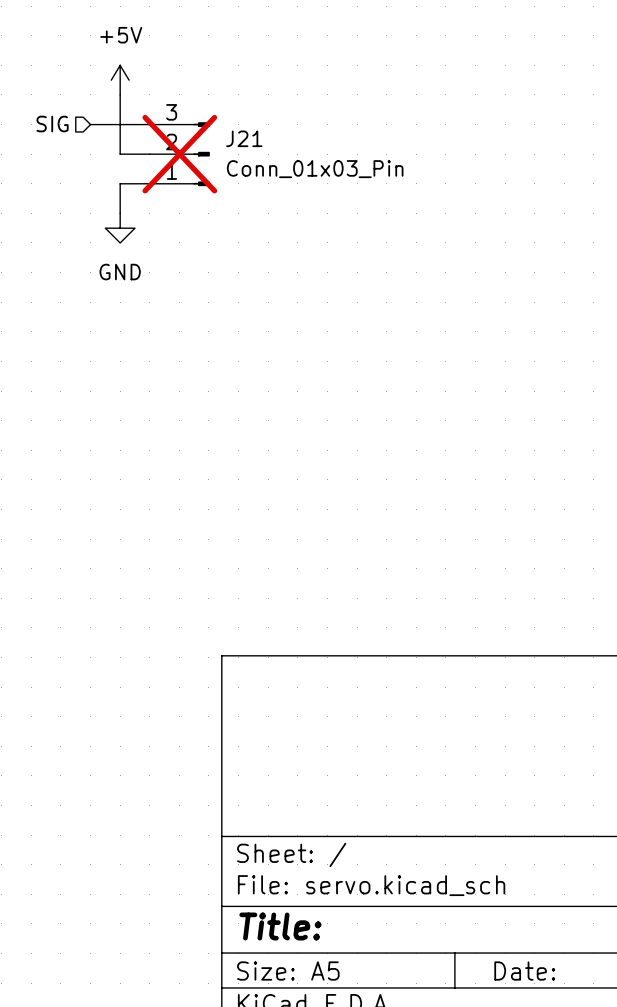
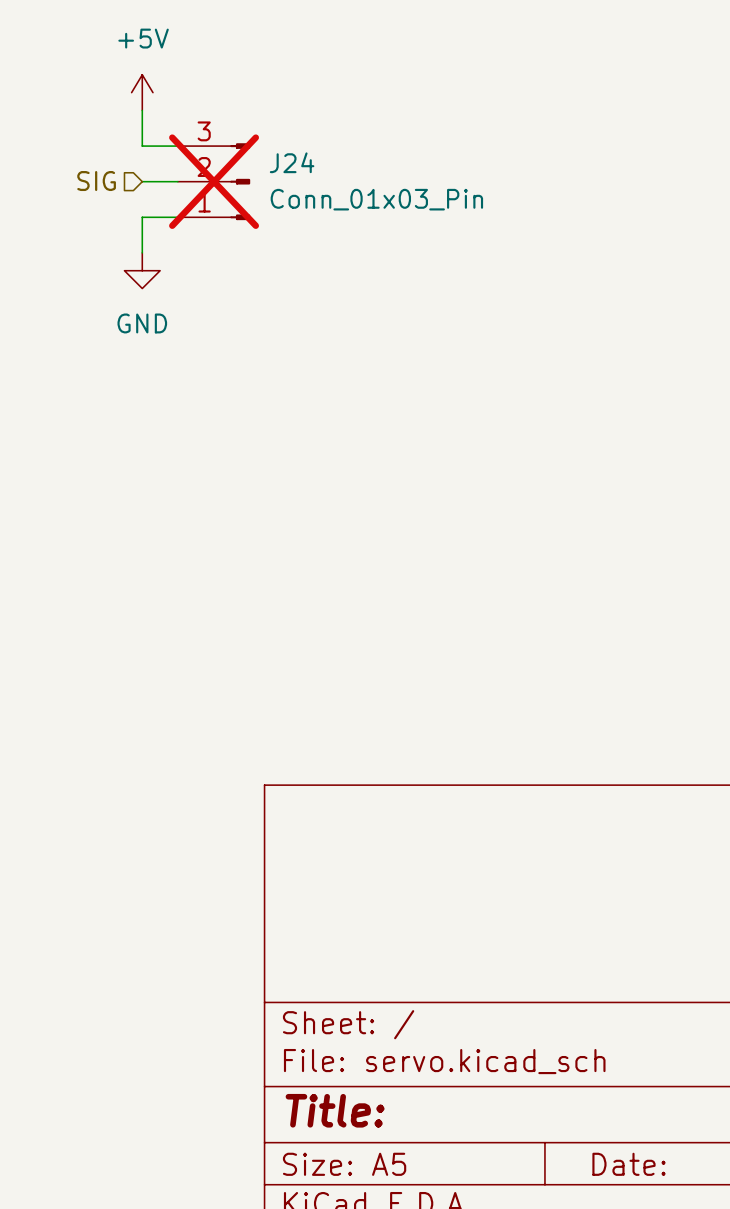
hierarchical label position: SIG (52, 124) -> SIG (96, 181)
wire: (90, 124) (120, 124) (120, 154) -> none
J21 name: J21 (244, 138) -> J24 (292, 162)

